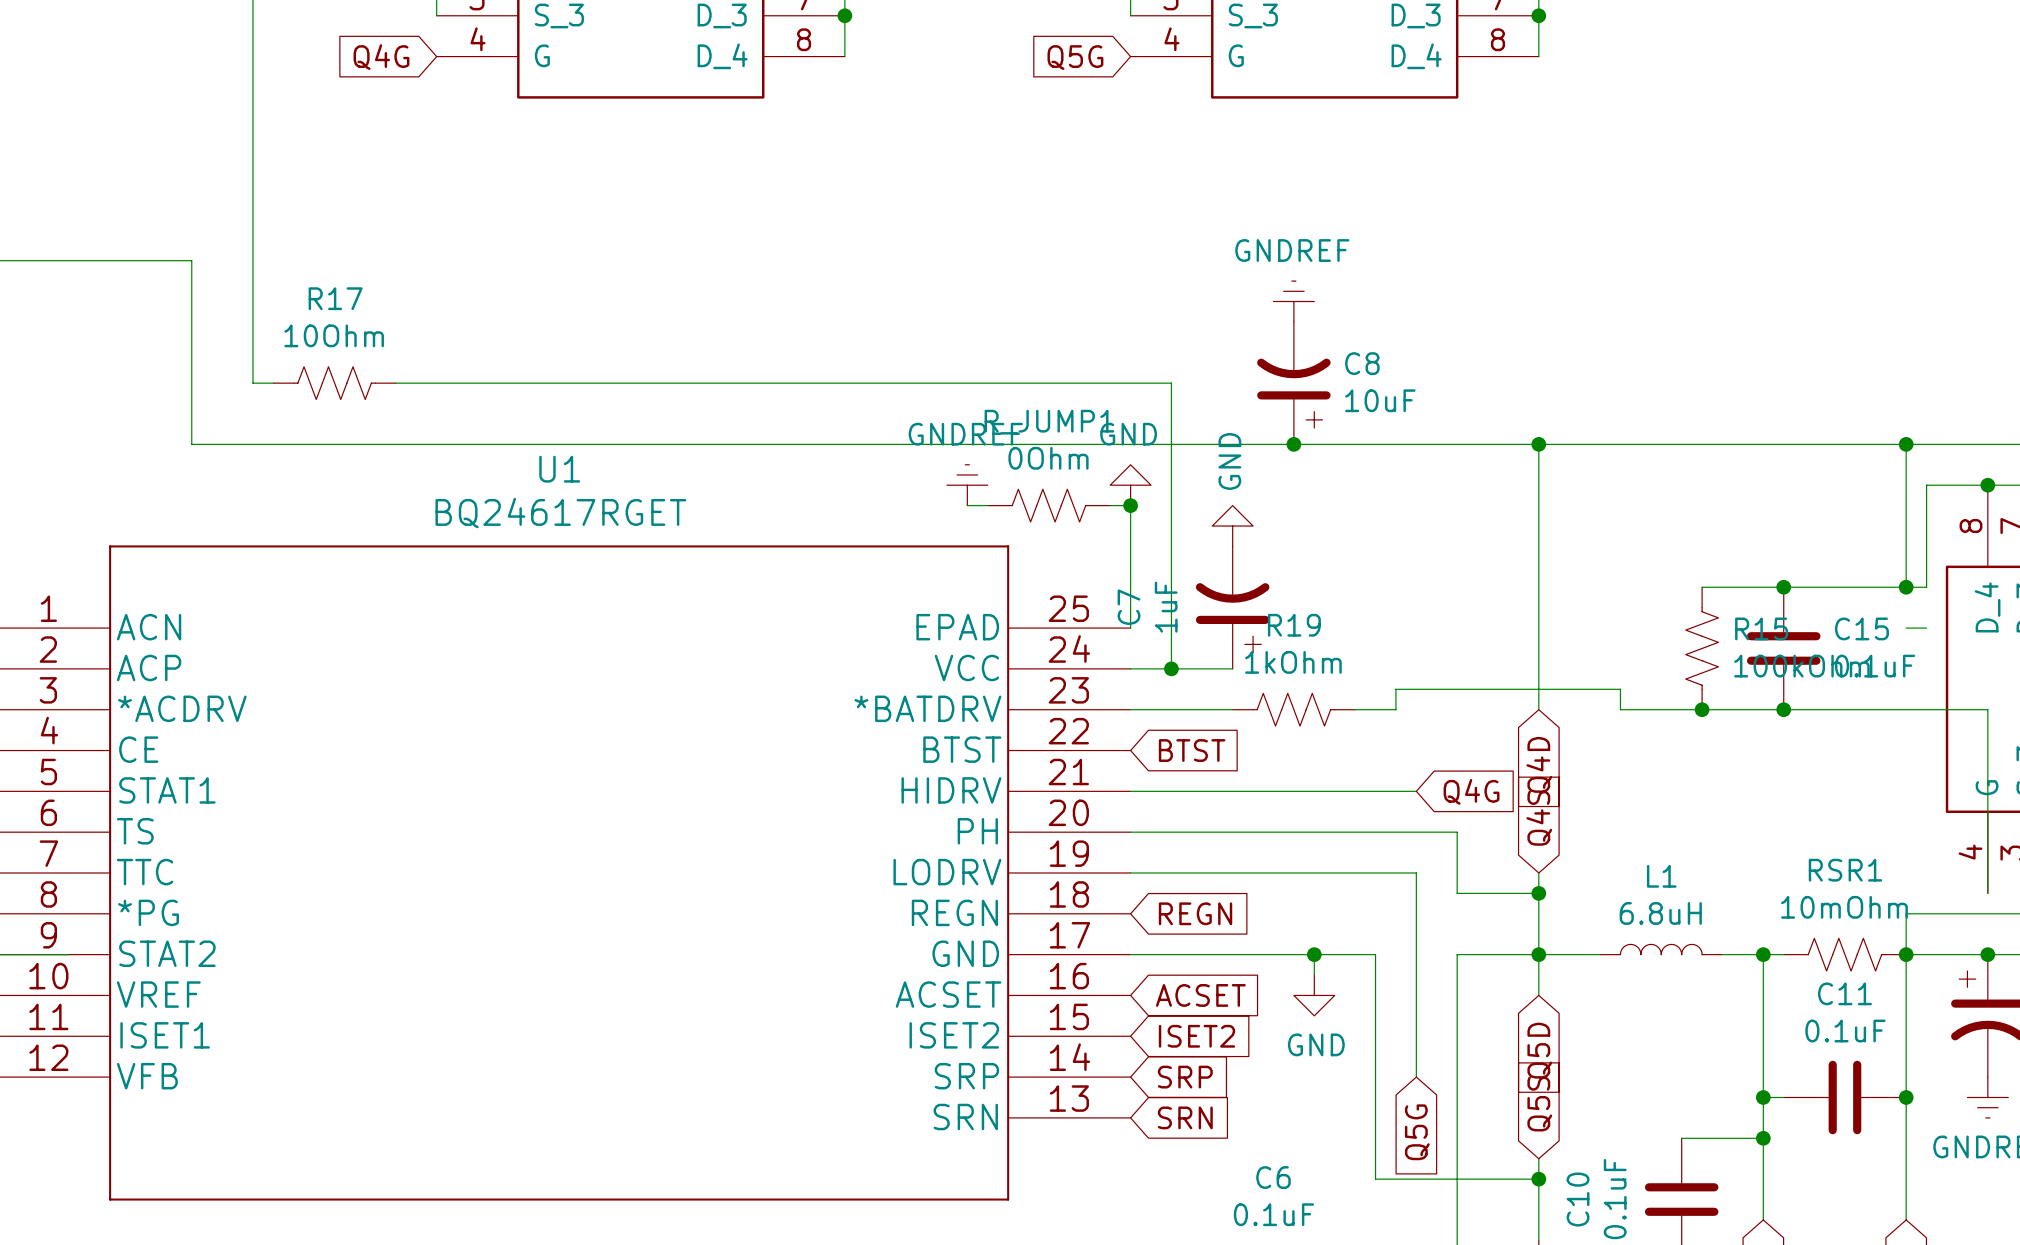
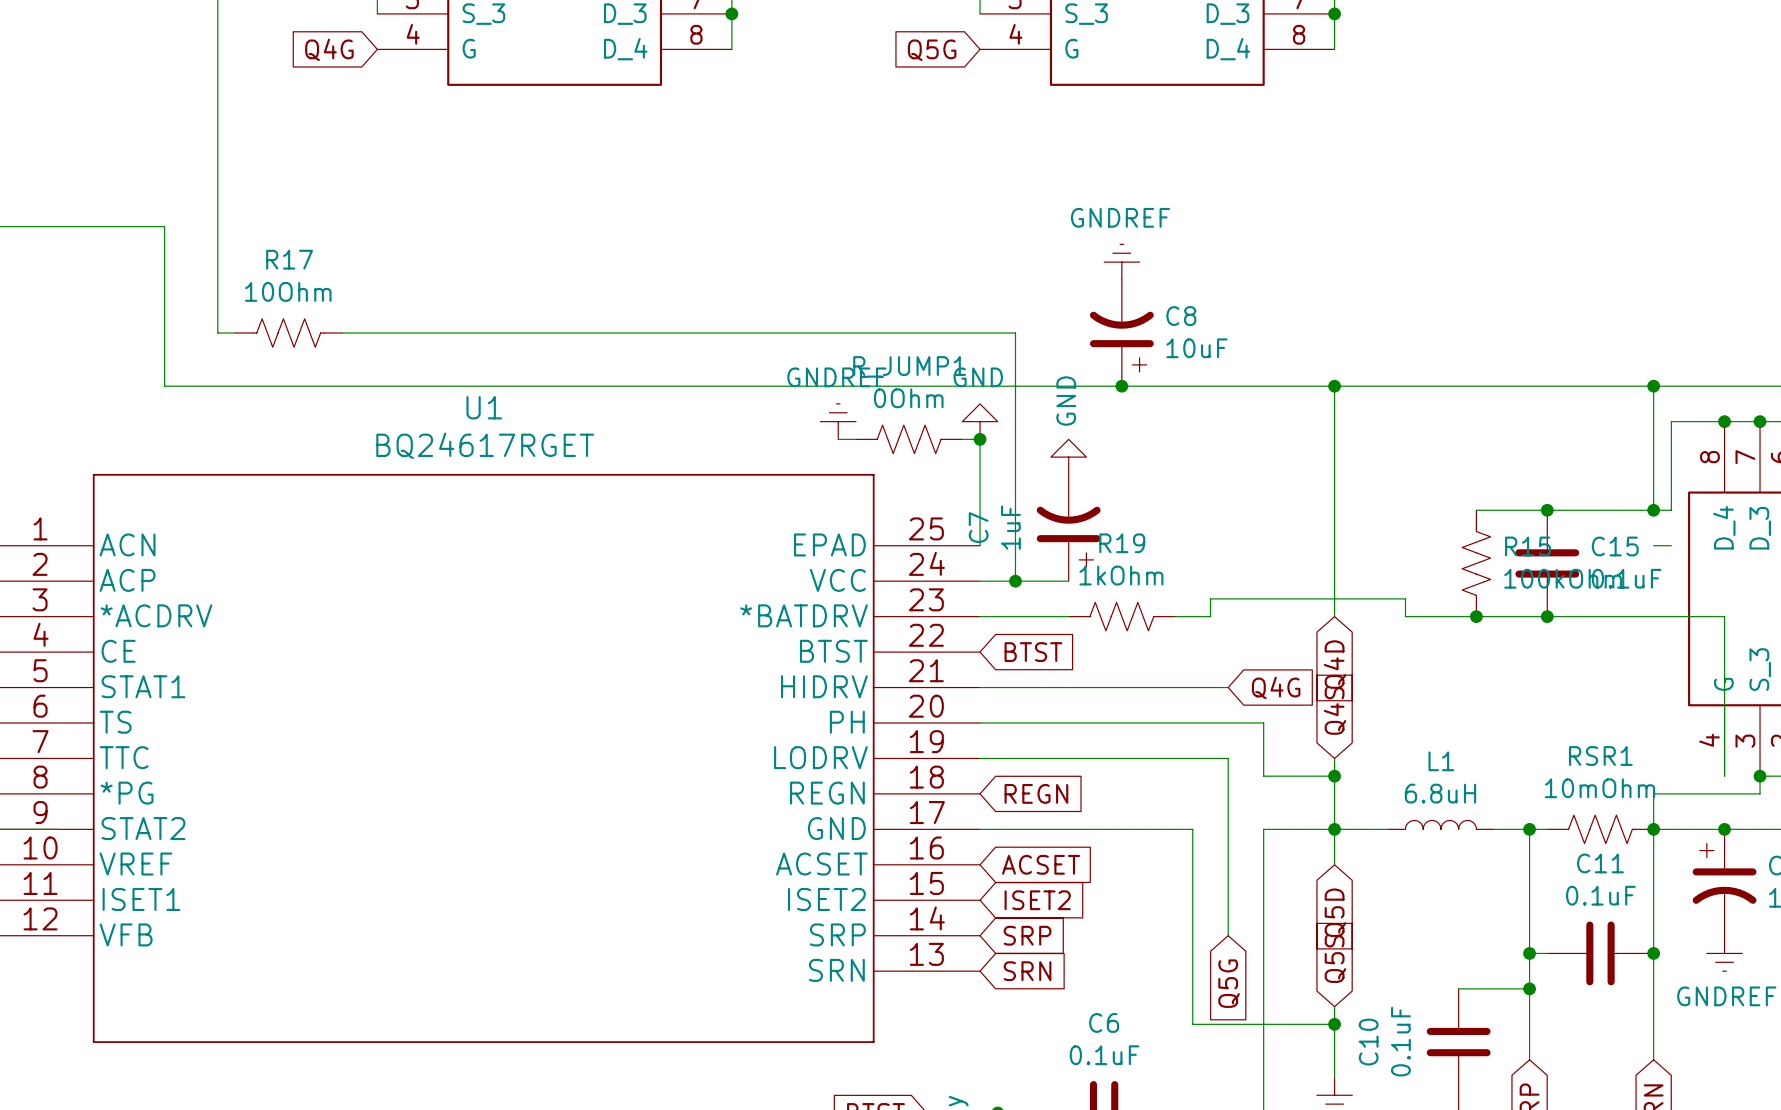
wire: (1314, 954) (1314, 975) -> none
junction: (1314, 954) -> none
power symbol: GND (1314, 995) -> none

